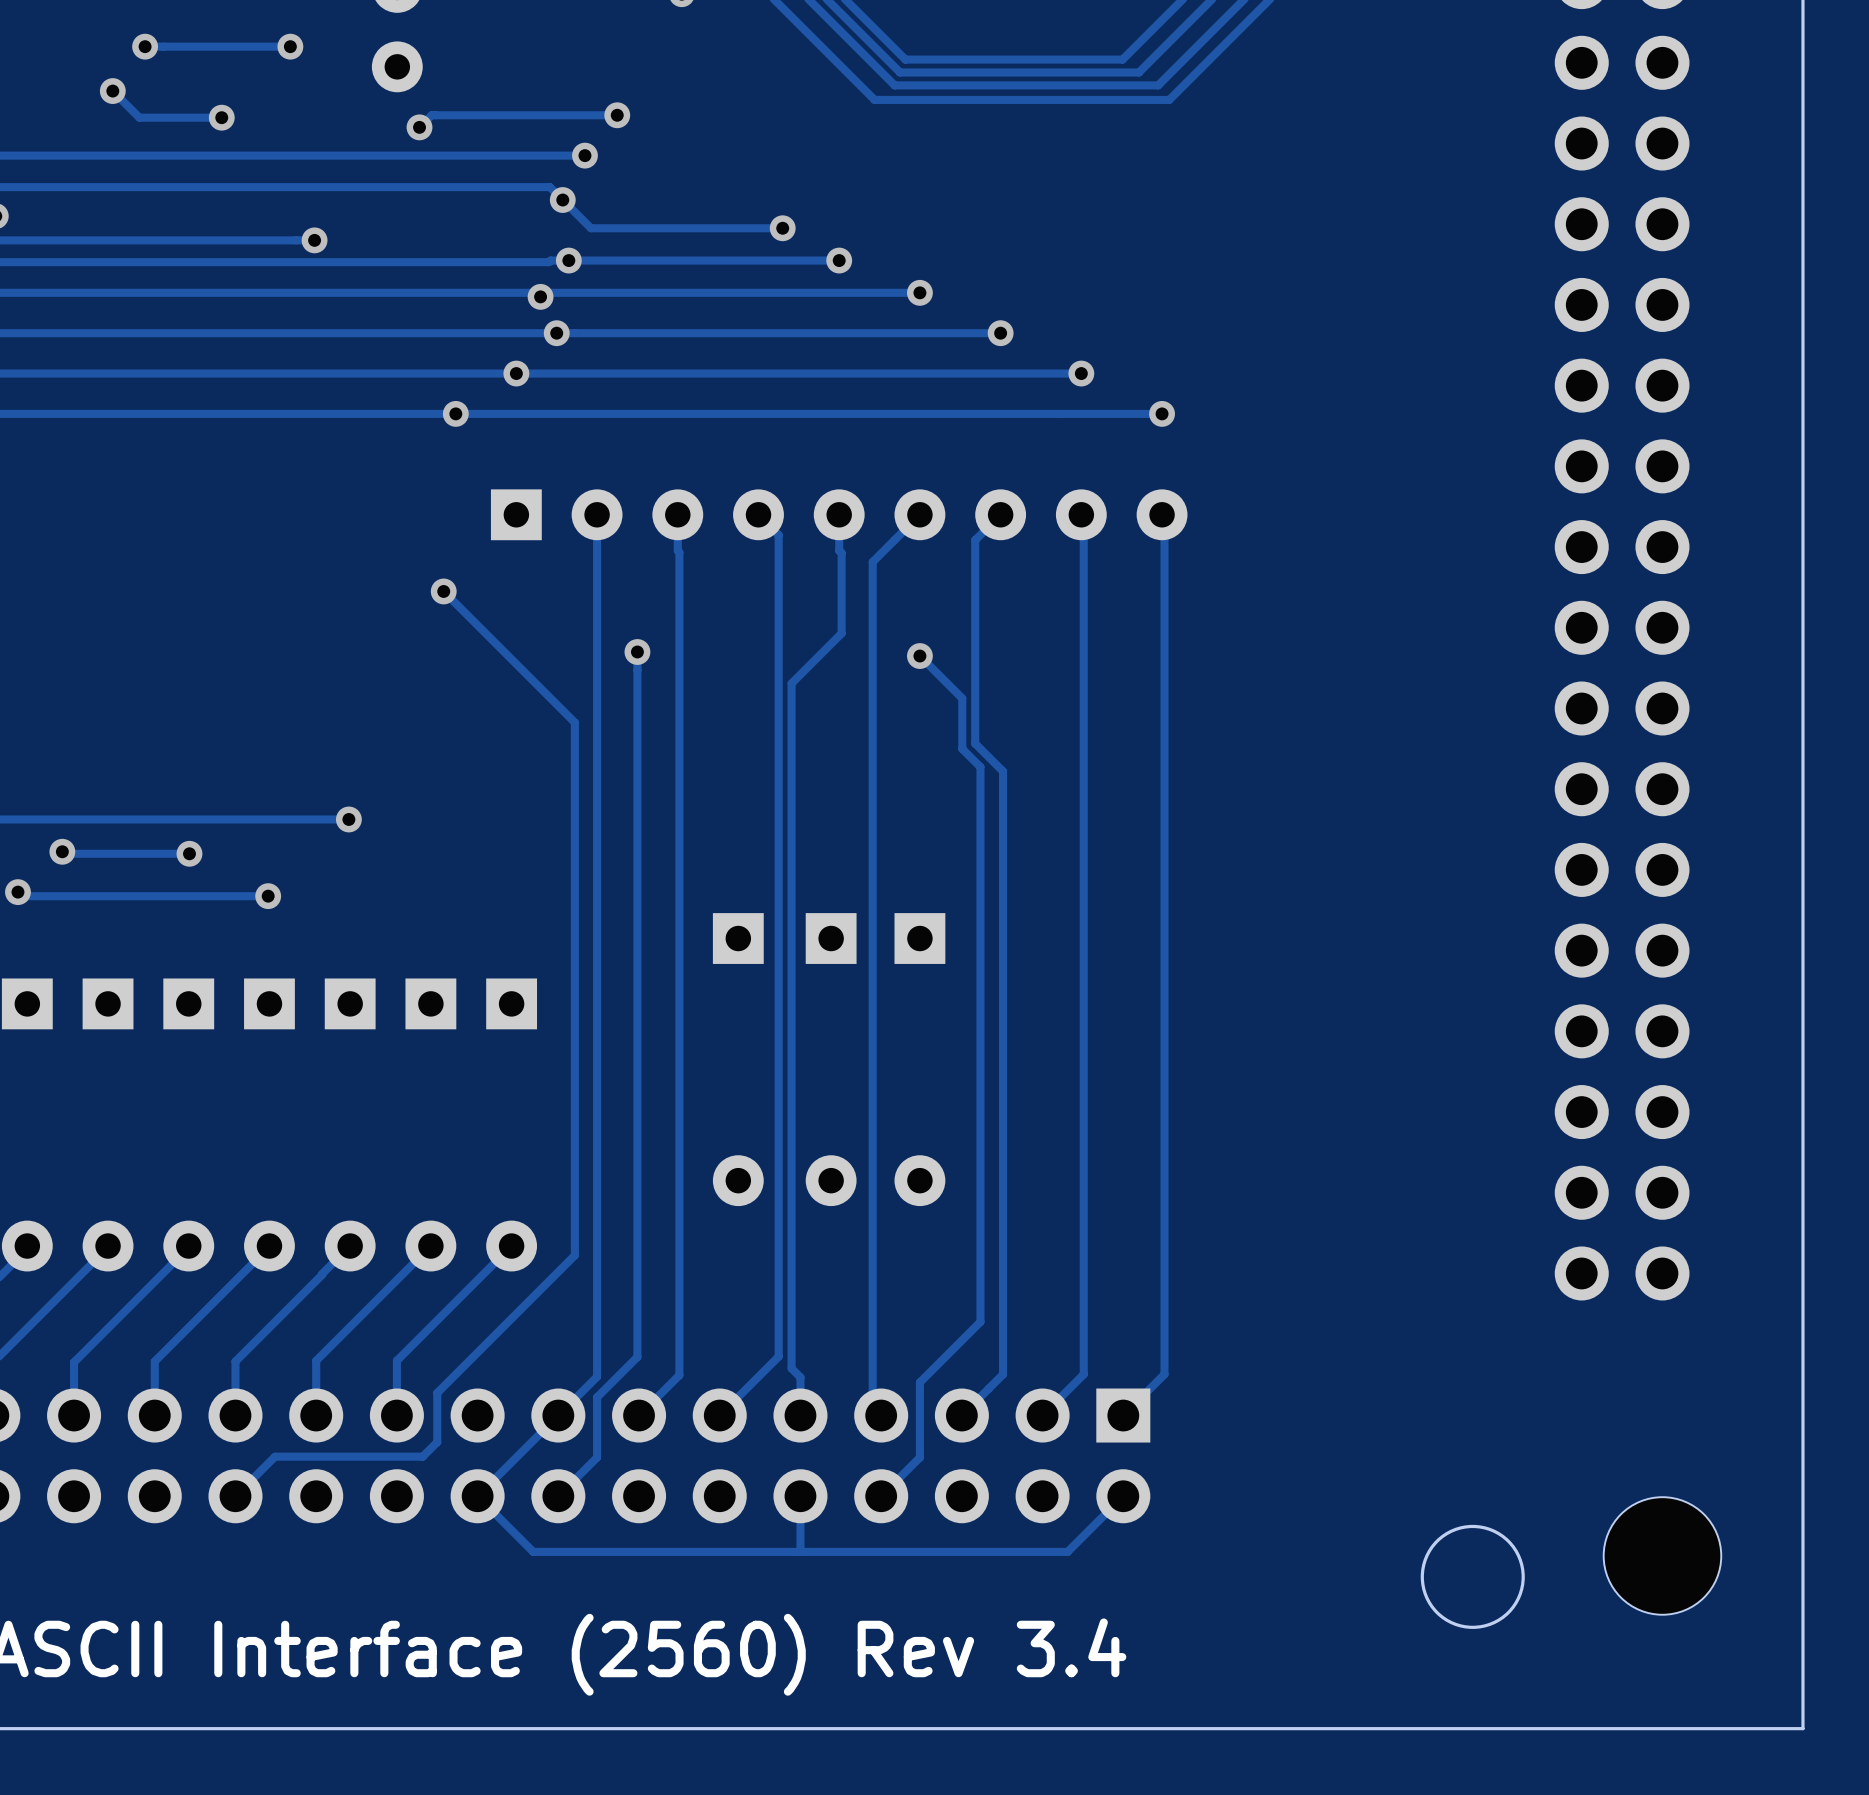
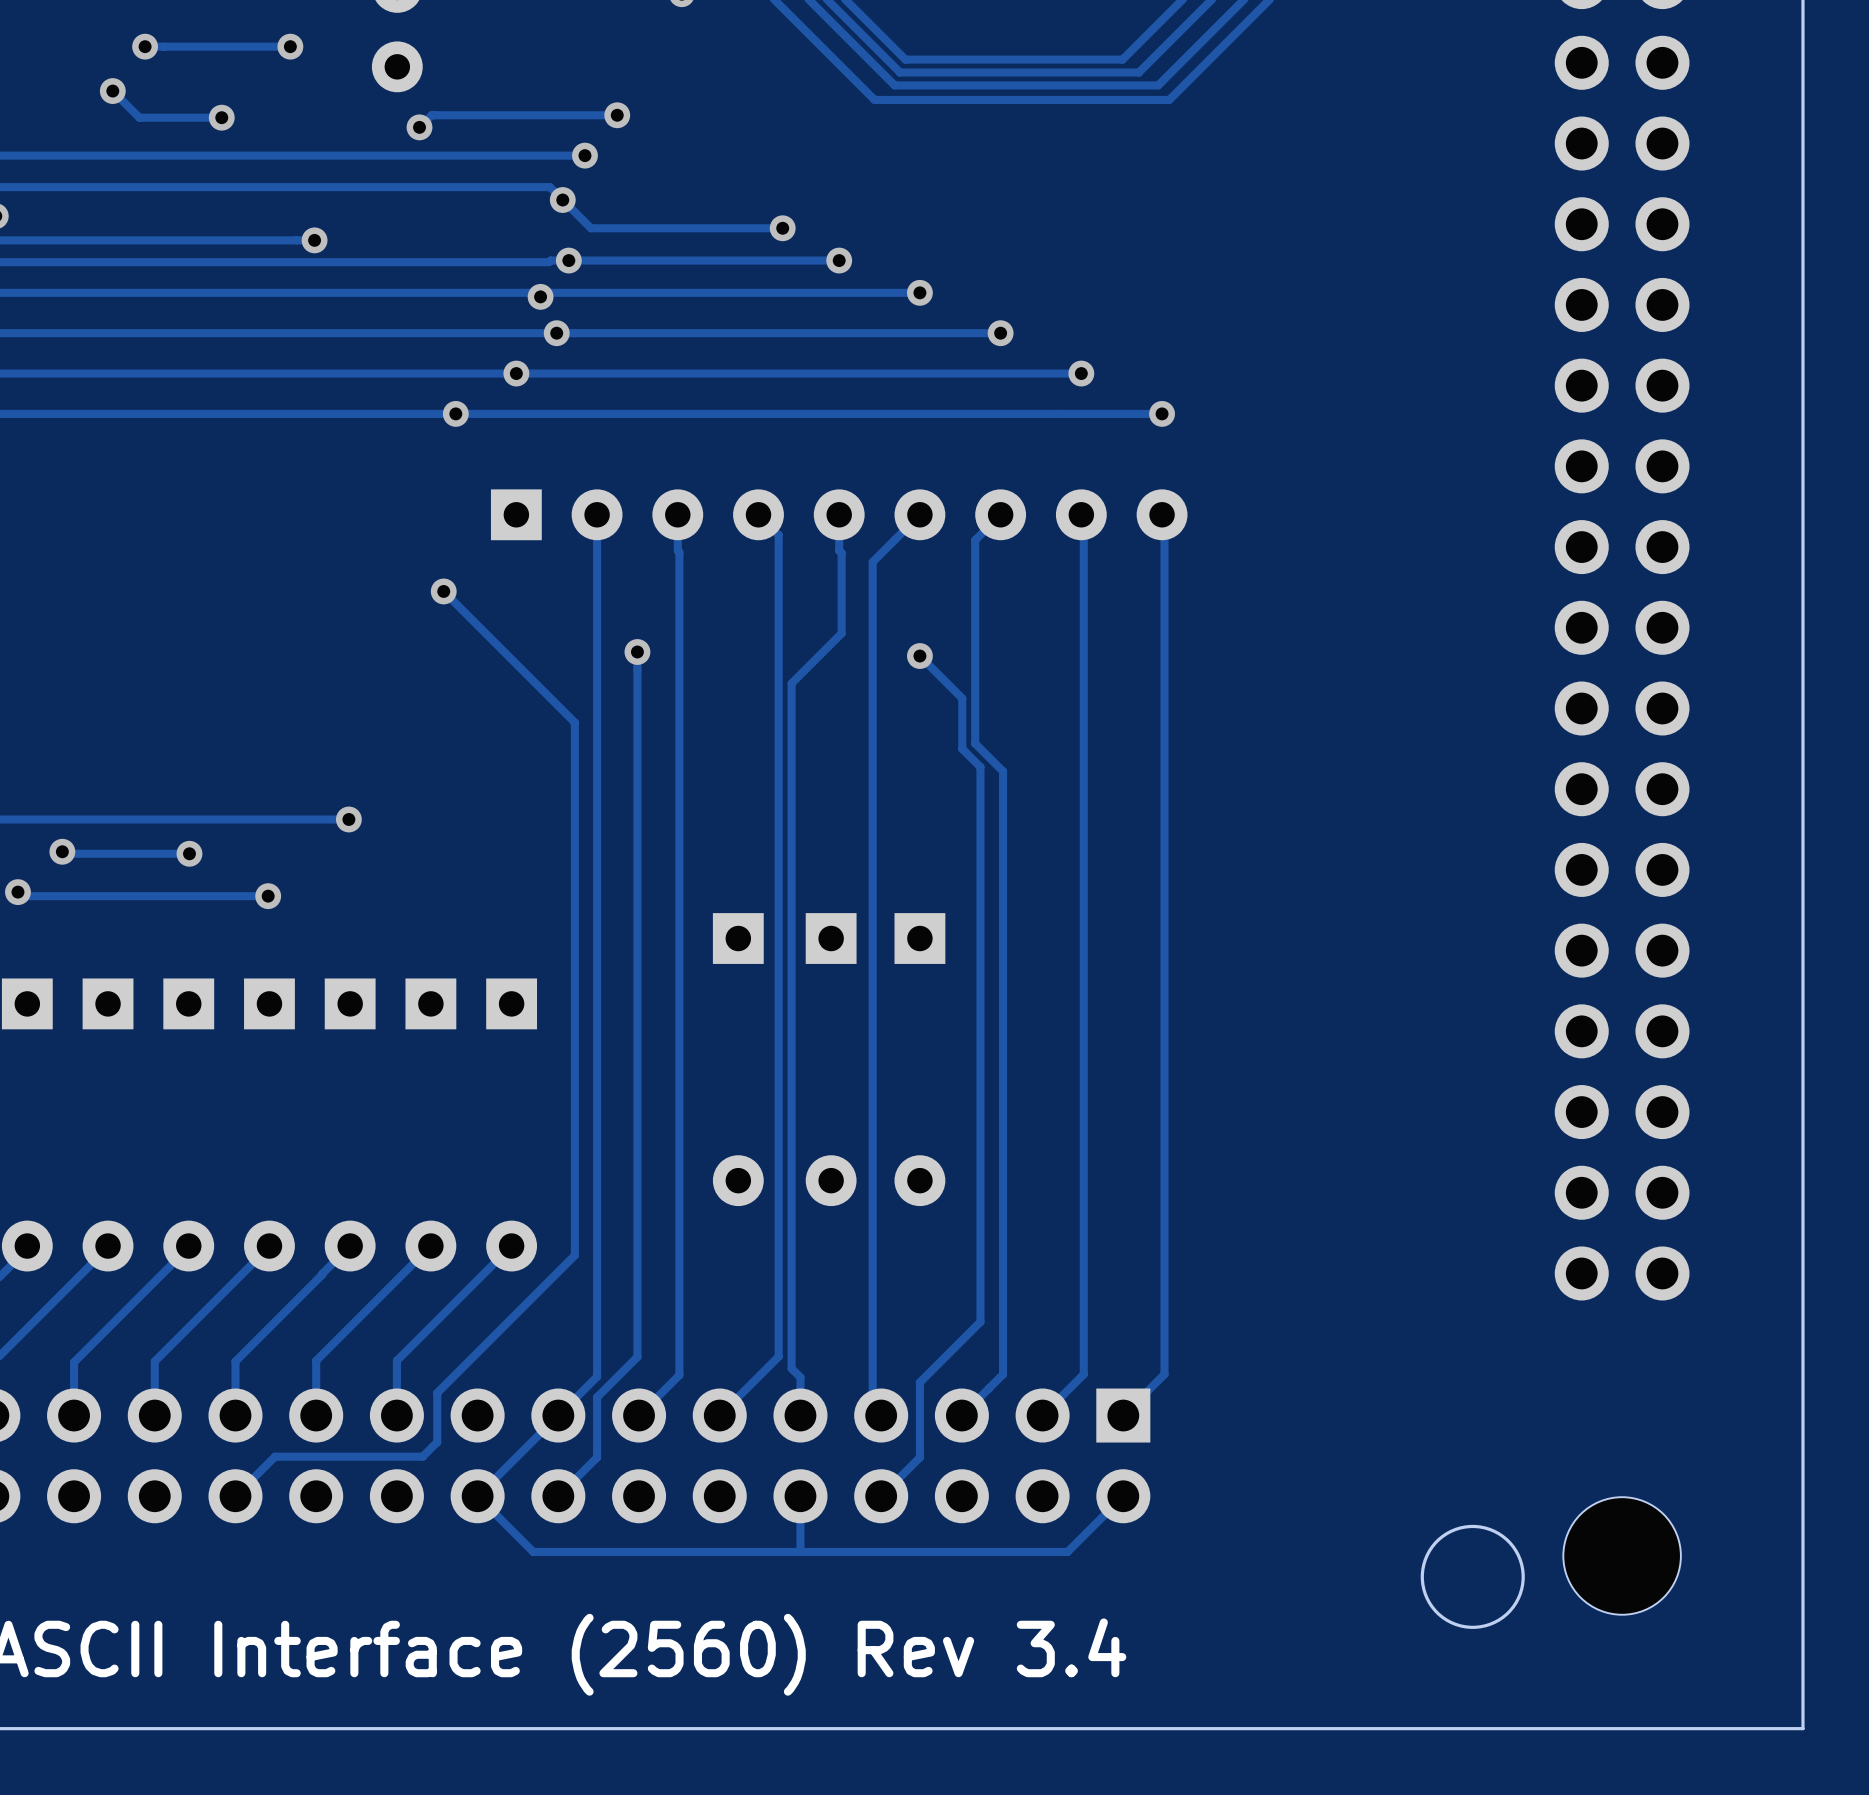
part position: (1662, 1555) -> (1622, 1555)

